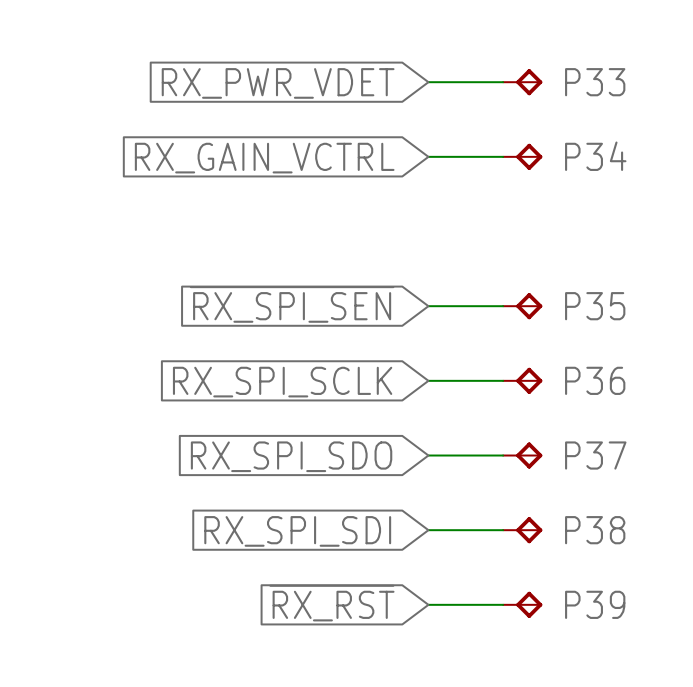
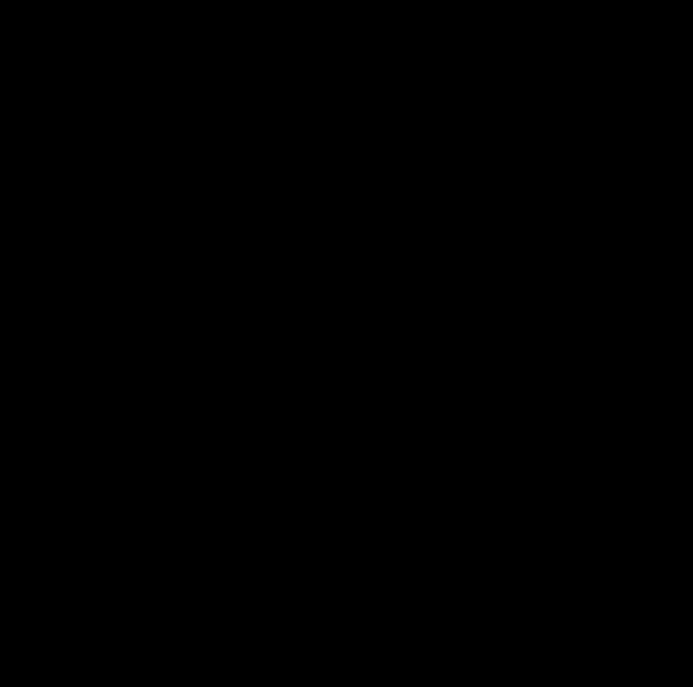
wire: (428, 82) (503, 82) -> none
P33: (522, 82) -> none
global label: RX_PWR_VDET (278, 83) -> none
wire: (428, 156) (503, 156) -> none
P34: (522, 156) -> none
global label: RX_GAIN_VCTRL (264, 158) -> none
global label: ~{RX_SPI_SEN} (292, 304) -> none
wire: (428, 306) (503, 306) -> none
P35: (522, 306) -> none
wire: (428, 380) (503, 380) -> none
P36: (522, 380) -> none
global label: RX_SPI_SCLK (282, 382) -> none
wire: (428, 455) (503, 455) -> none
P37: (522, 455) -> none
global label: RX_SPI_SDO (291, 456) -> none
wire: (428, 530) (503, 530) -> none
P38: (522, 530) -> none
global label: RX_SPI_SDI (297, 531) -> none
global label: ~{RX_RST} (331, 603) -> none
wire: (428, 604) (503, 604) -> none
P39: (522, 604) -> none

